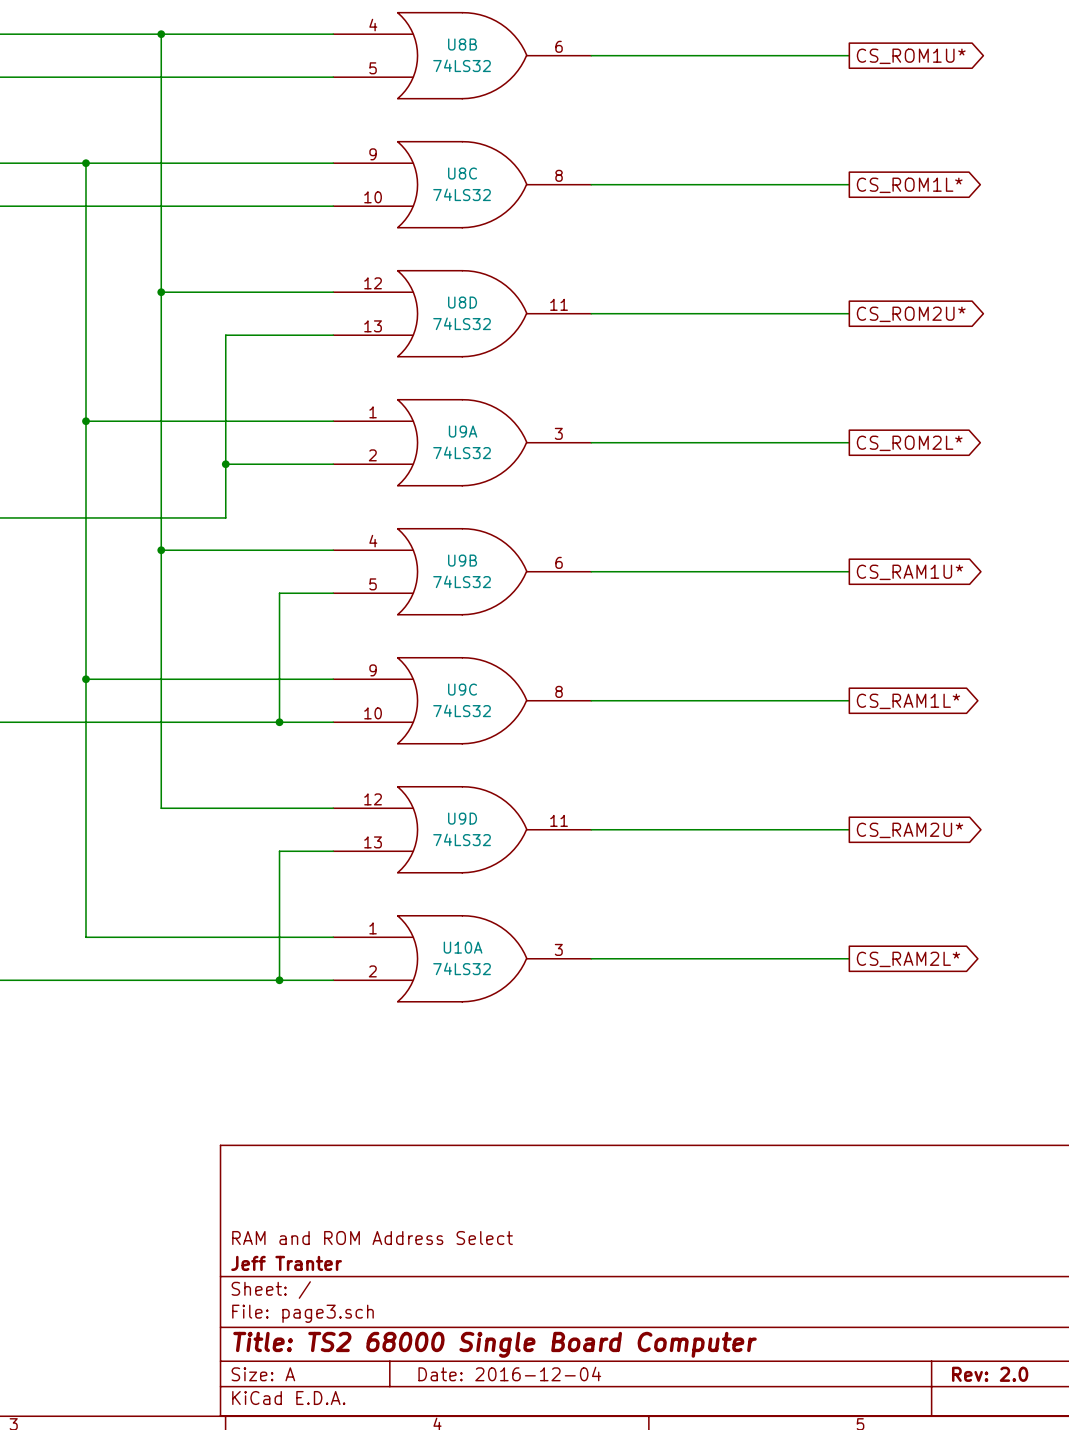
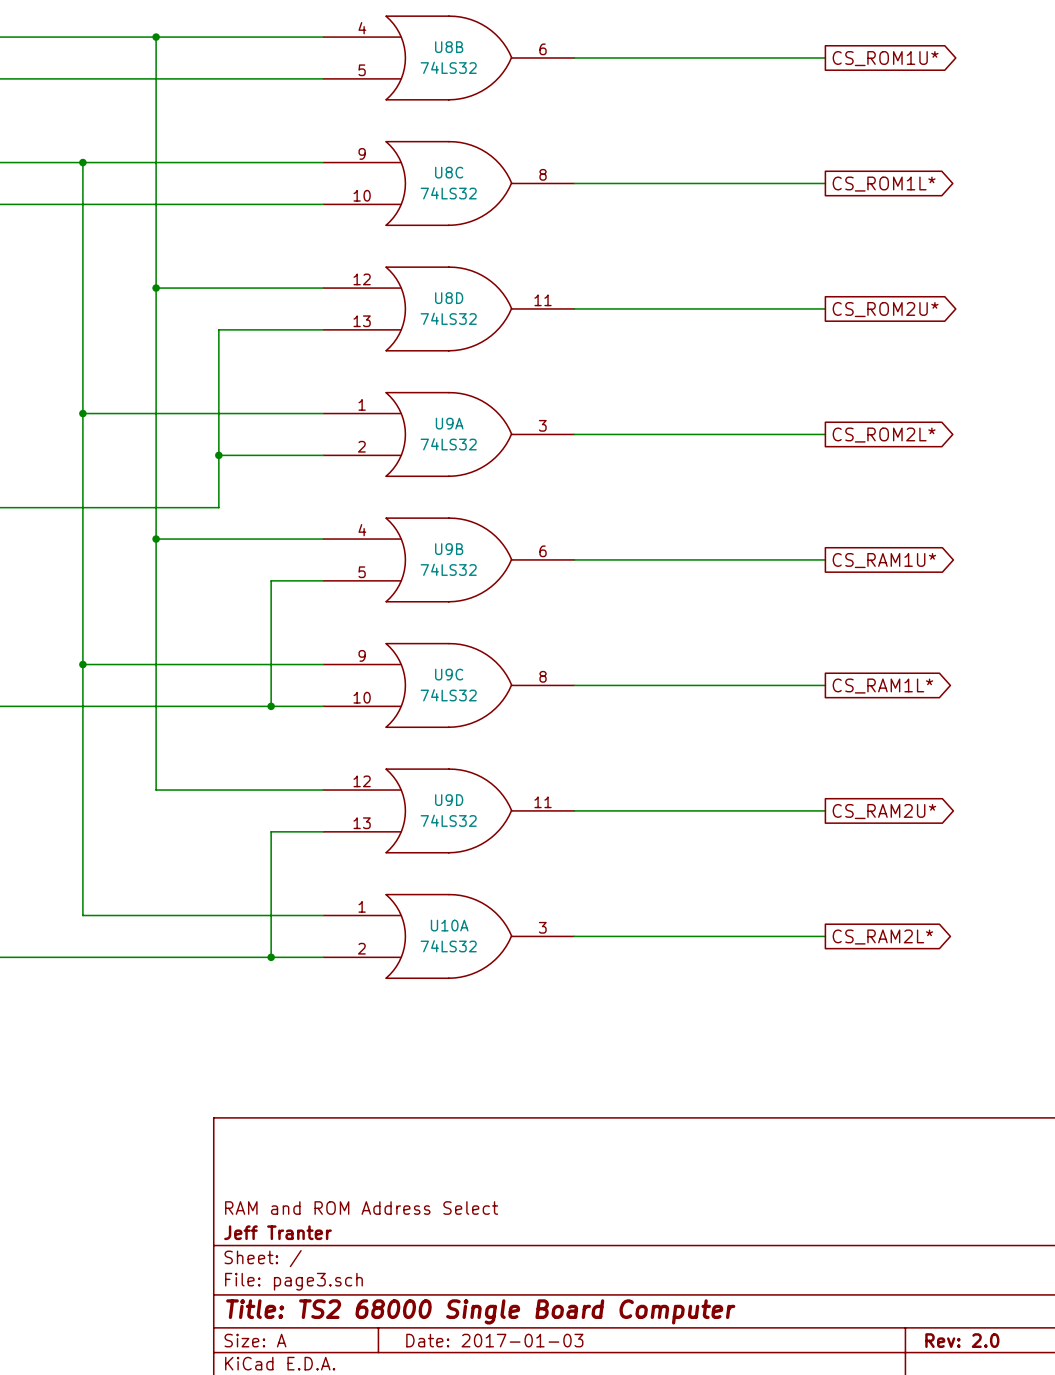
title block: Date: 2016-12-04 (509, 1374) -> Date: 2017-01-03 (494, 1340)

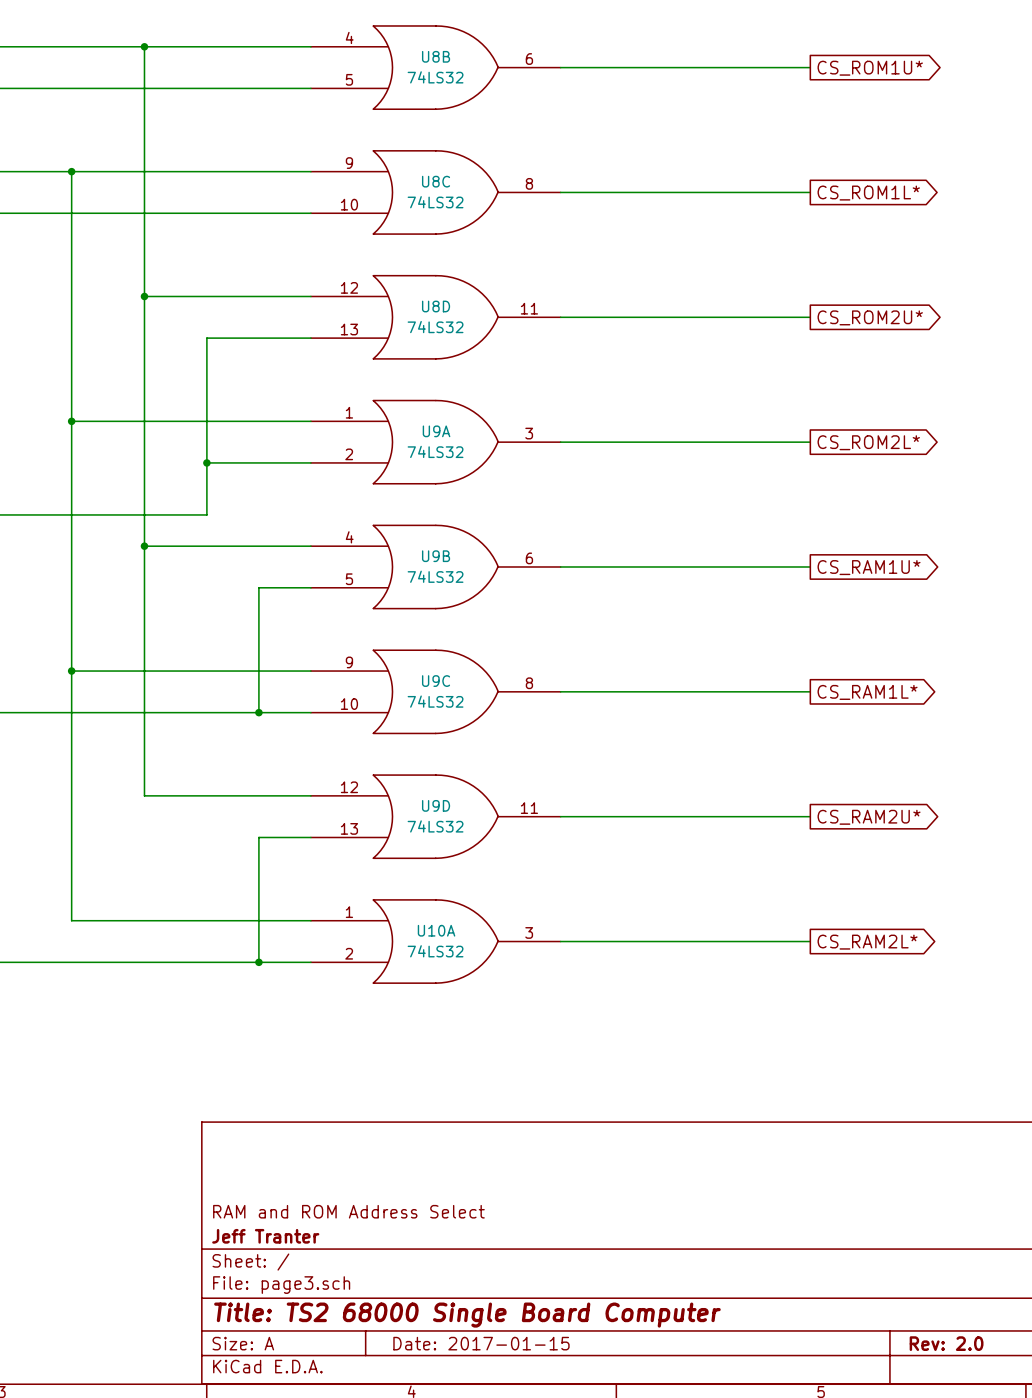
title block: Date: 2017-01-03 (494, 1340) -> Date: 2017-01-15 (481, 1343)

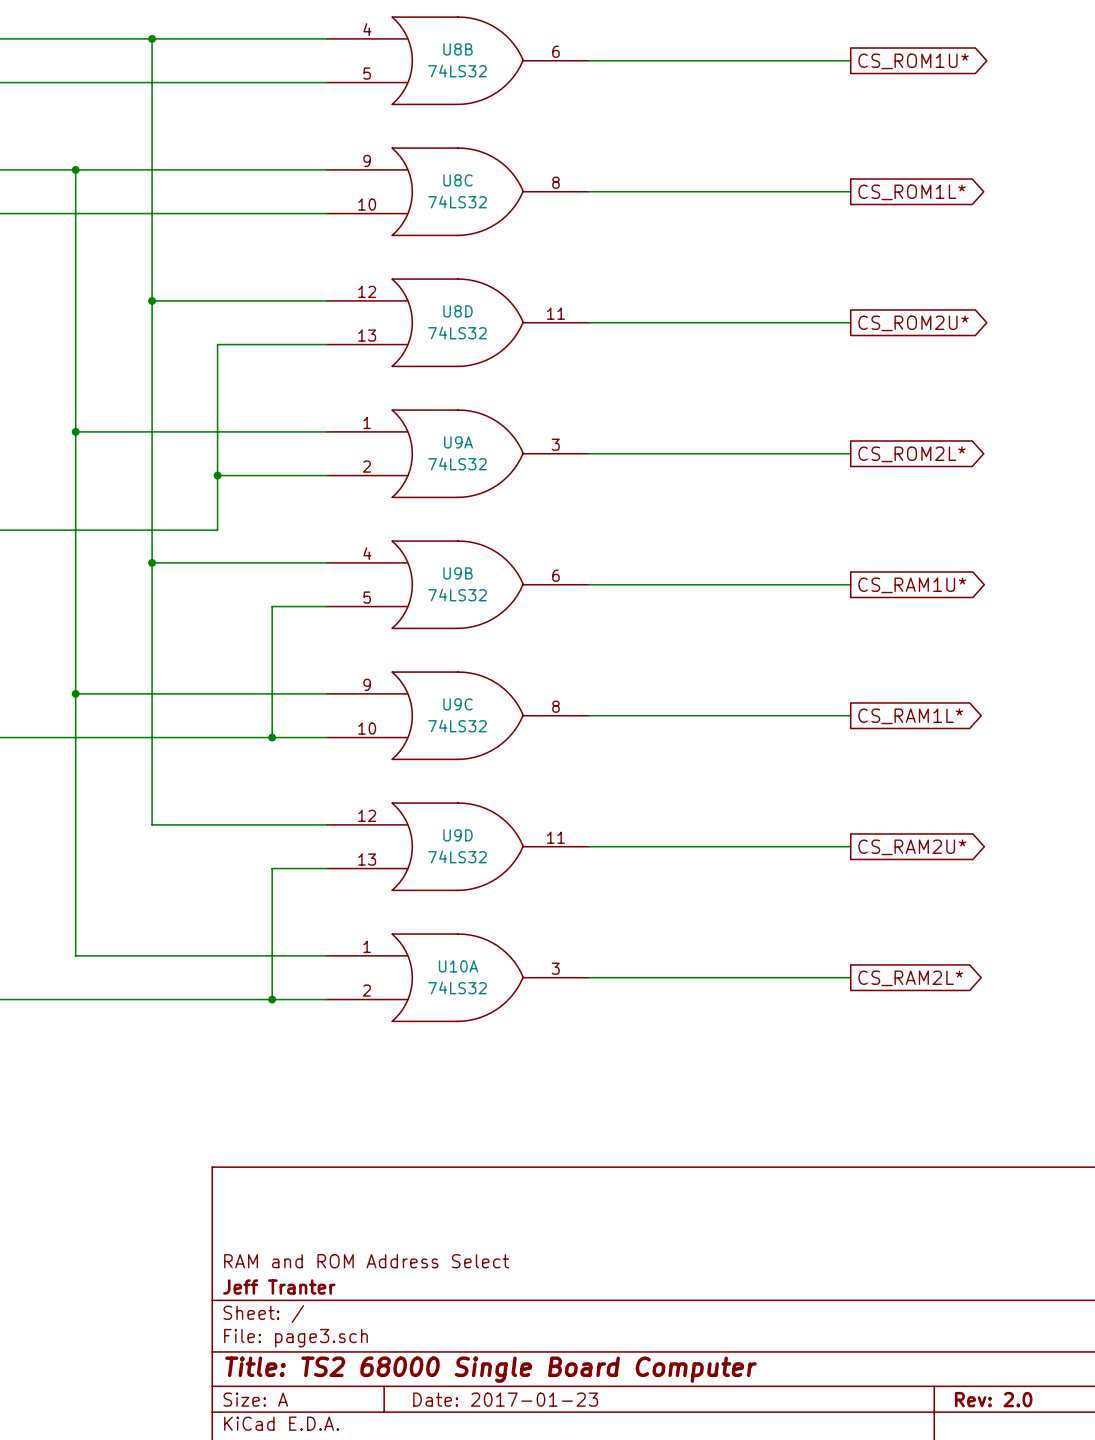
title block: Date: 2017-01-15 (481, 1343) -> Date: 2017-01-23 (505, 1399)

